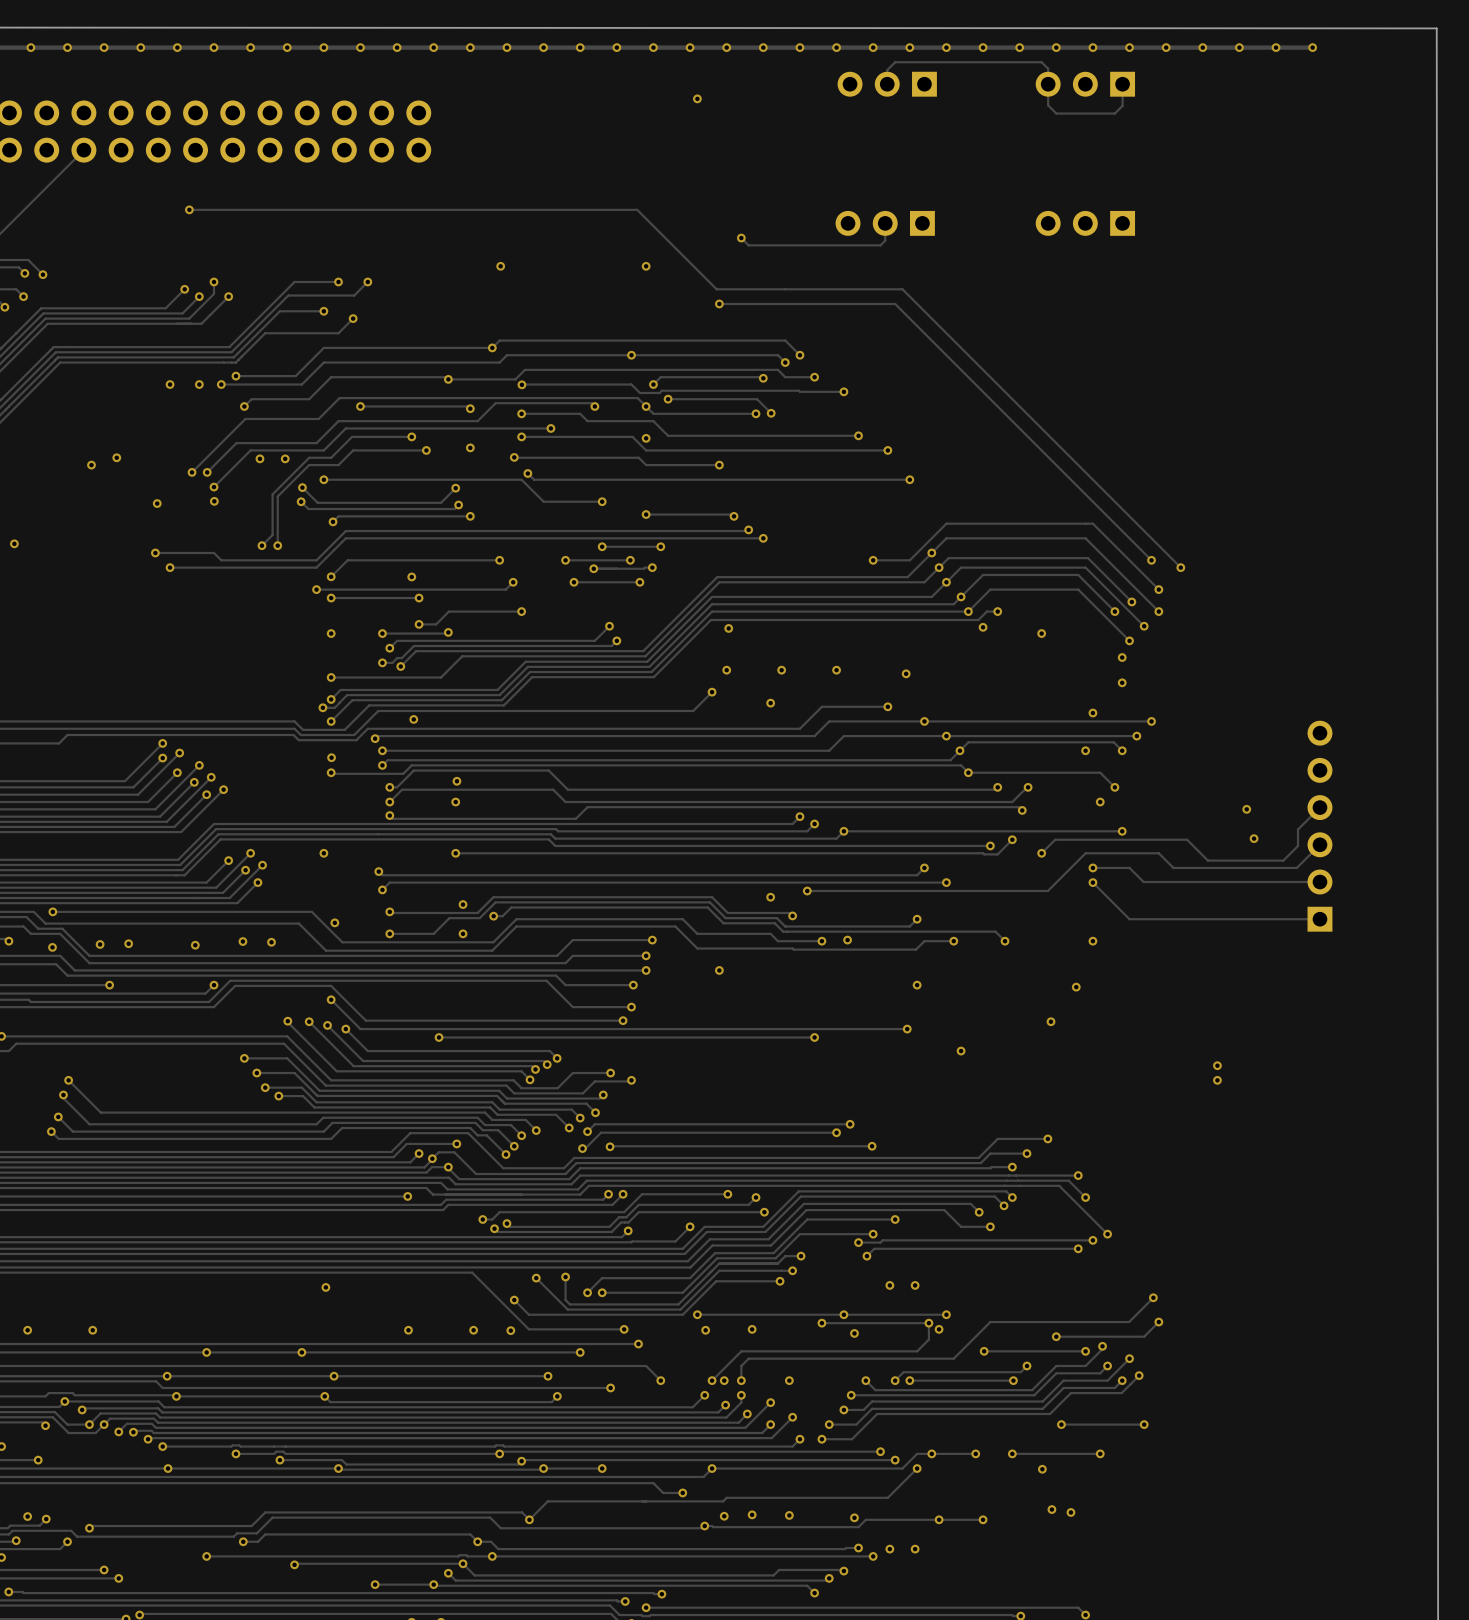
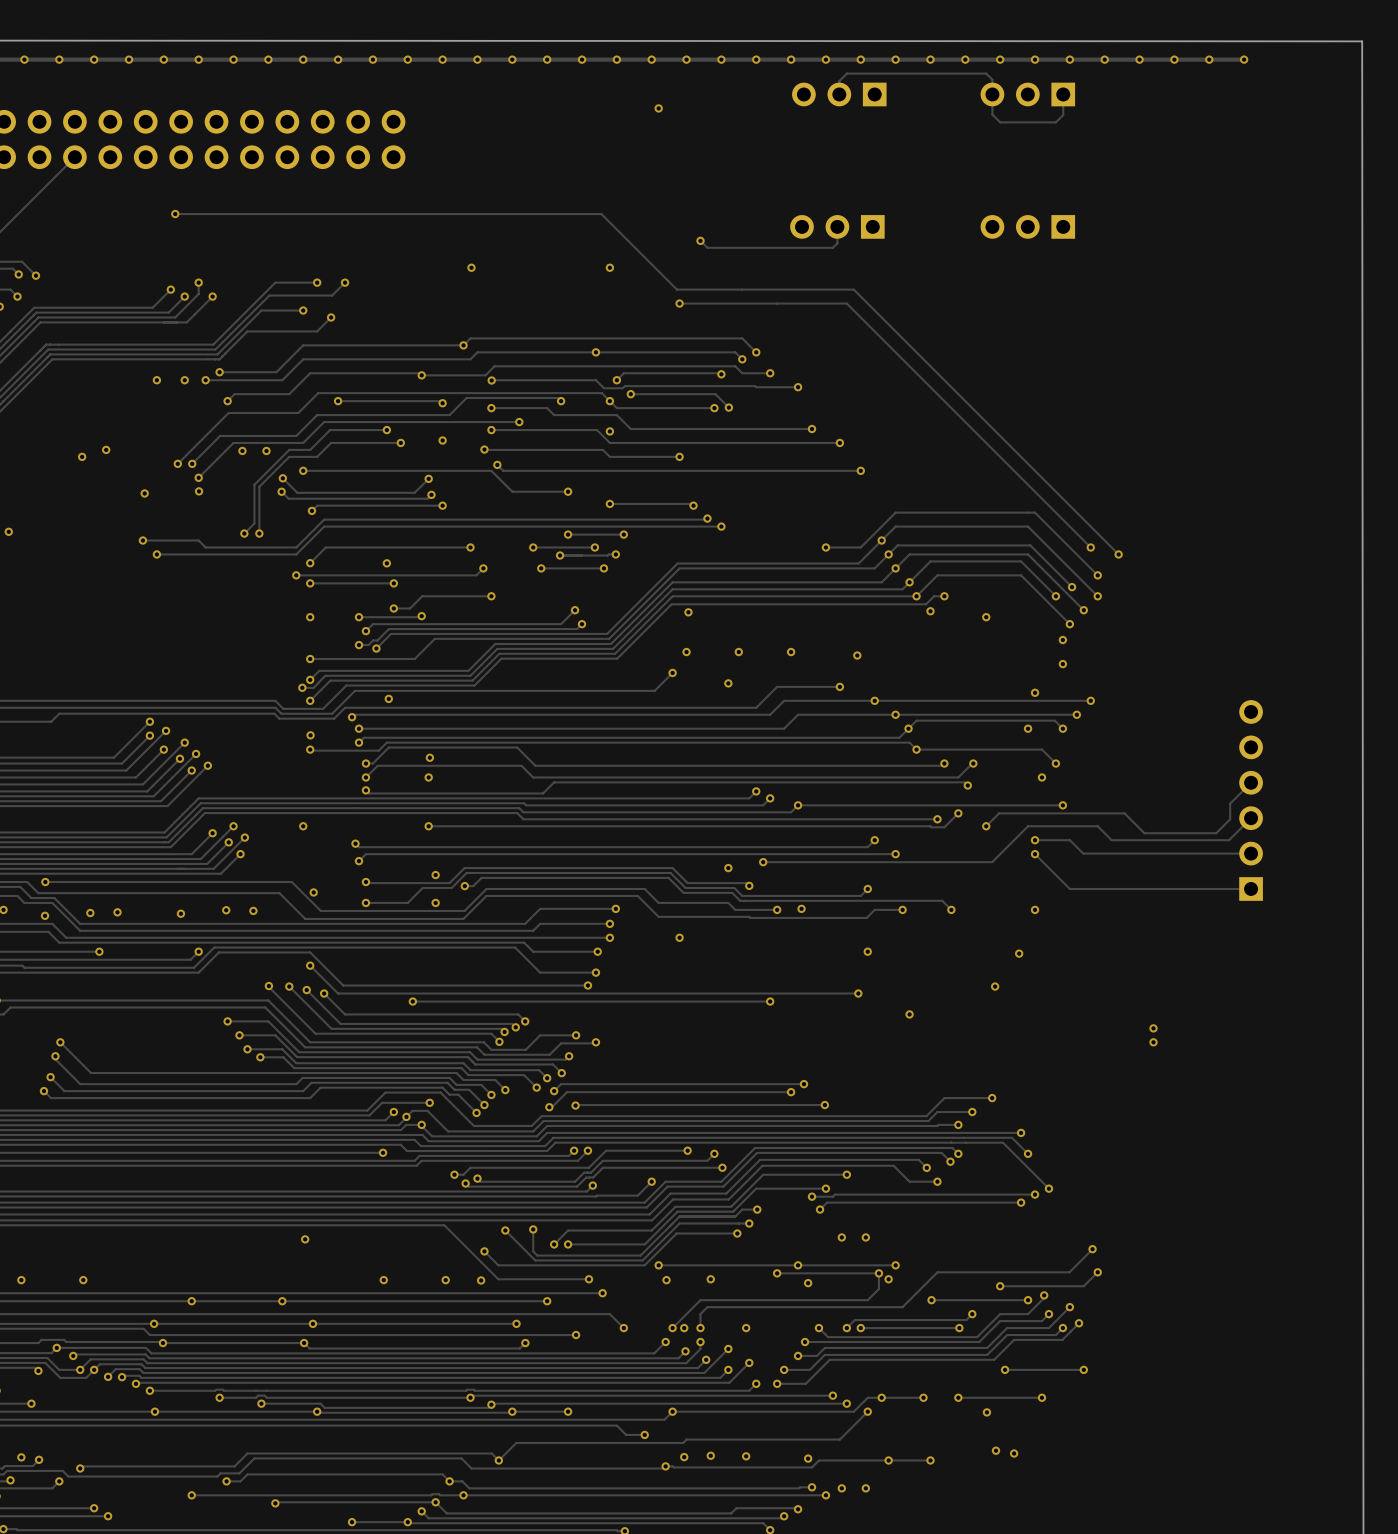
via: (1246, 809) -> none
via: (1254, 838) -> none

